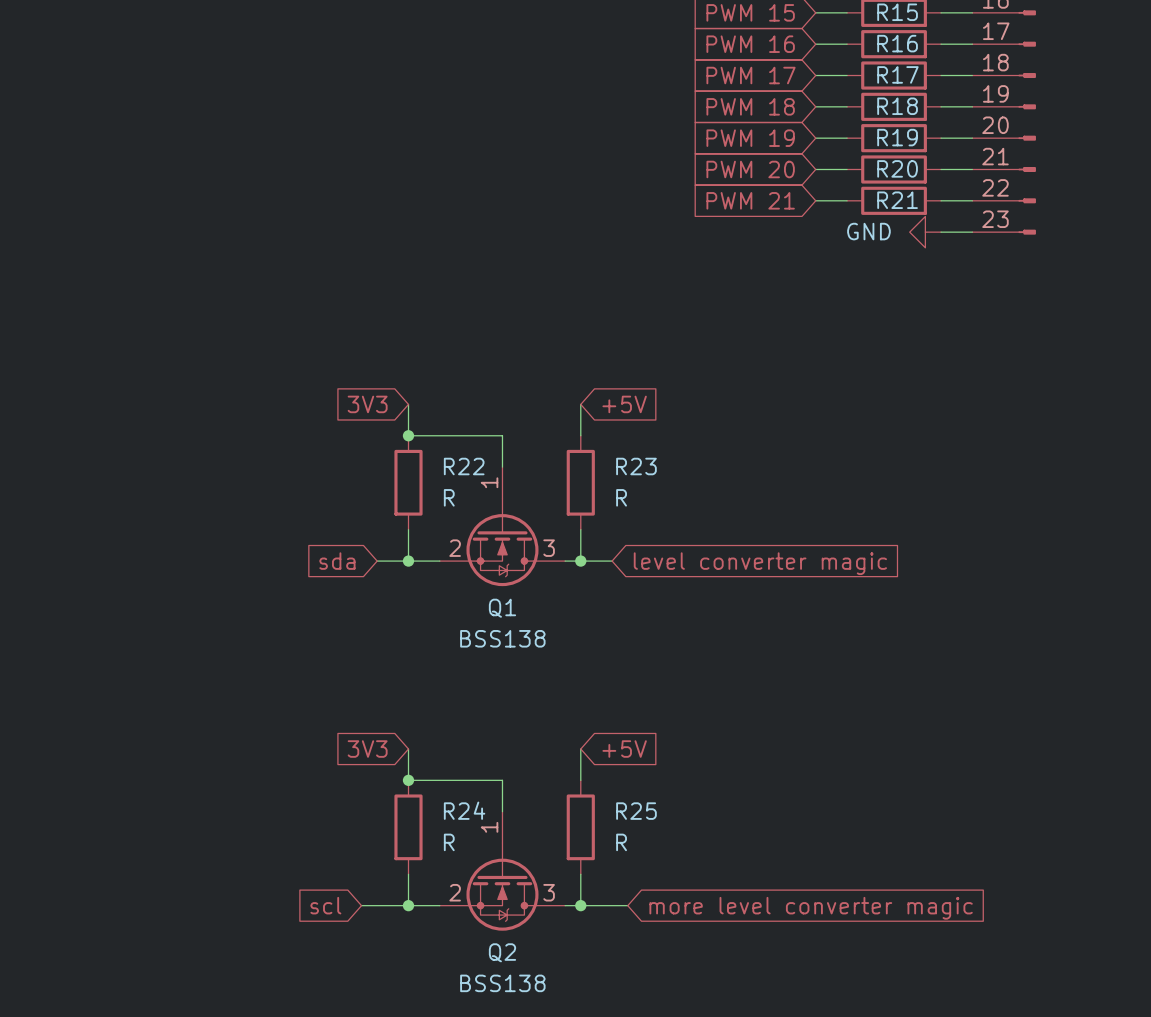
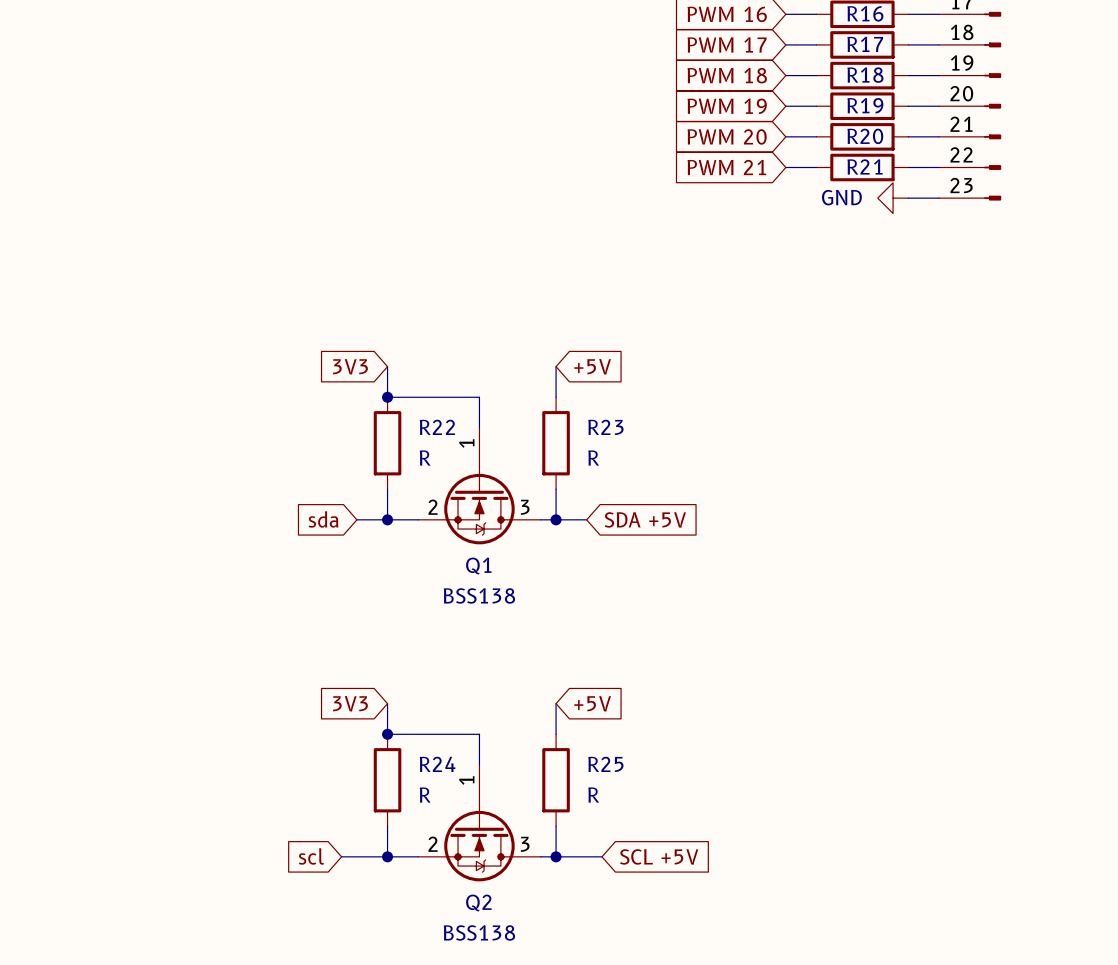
global label: level converter magic (760, 563) -> SDA +5V (645, 519)
global label: more level converter magic (811, 908) -> SCL +5V (659, 856)

